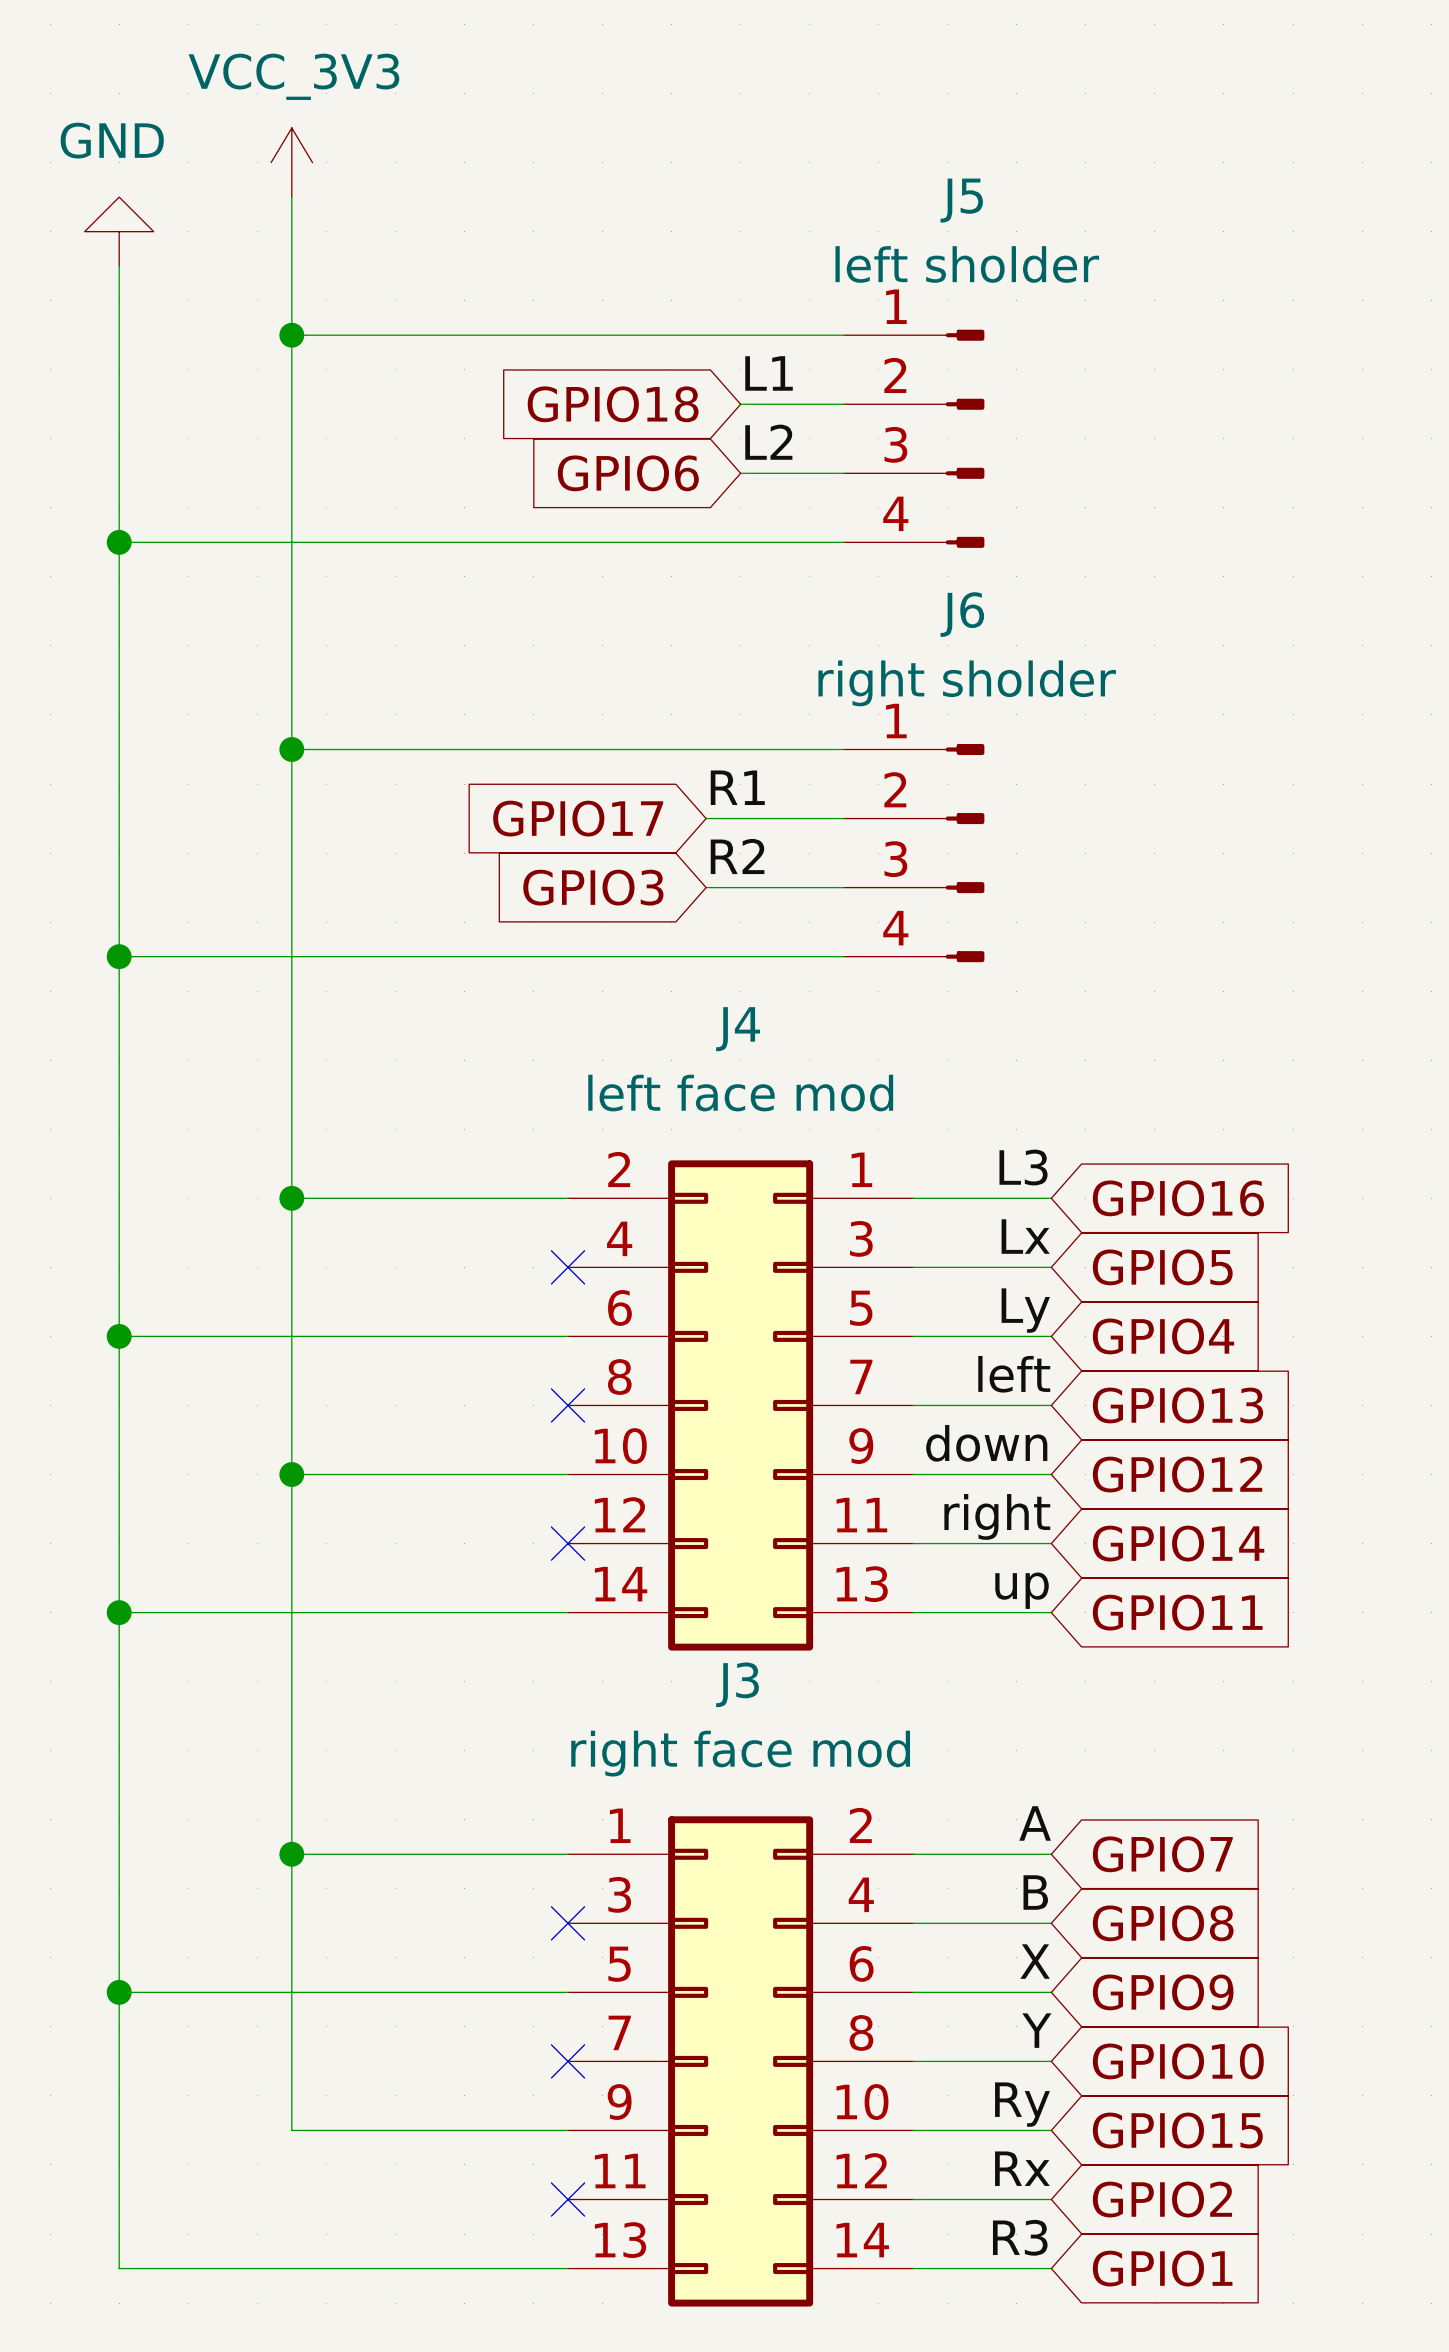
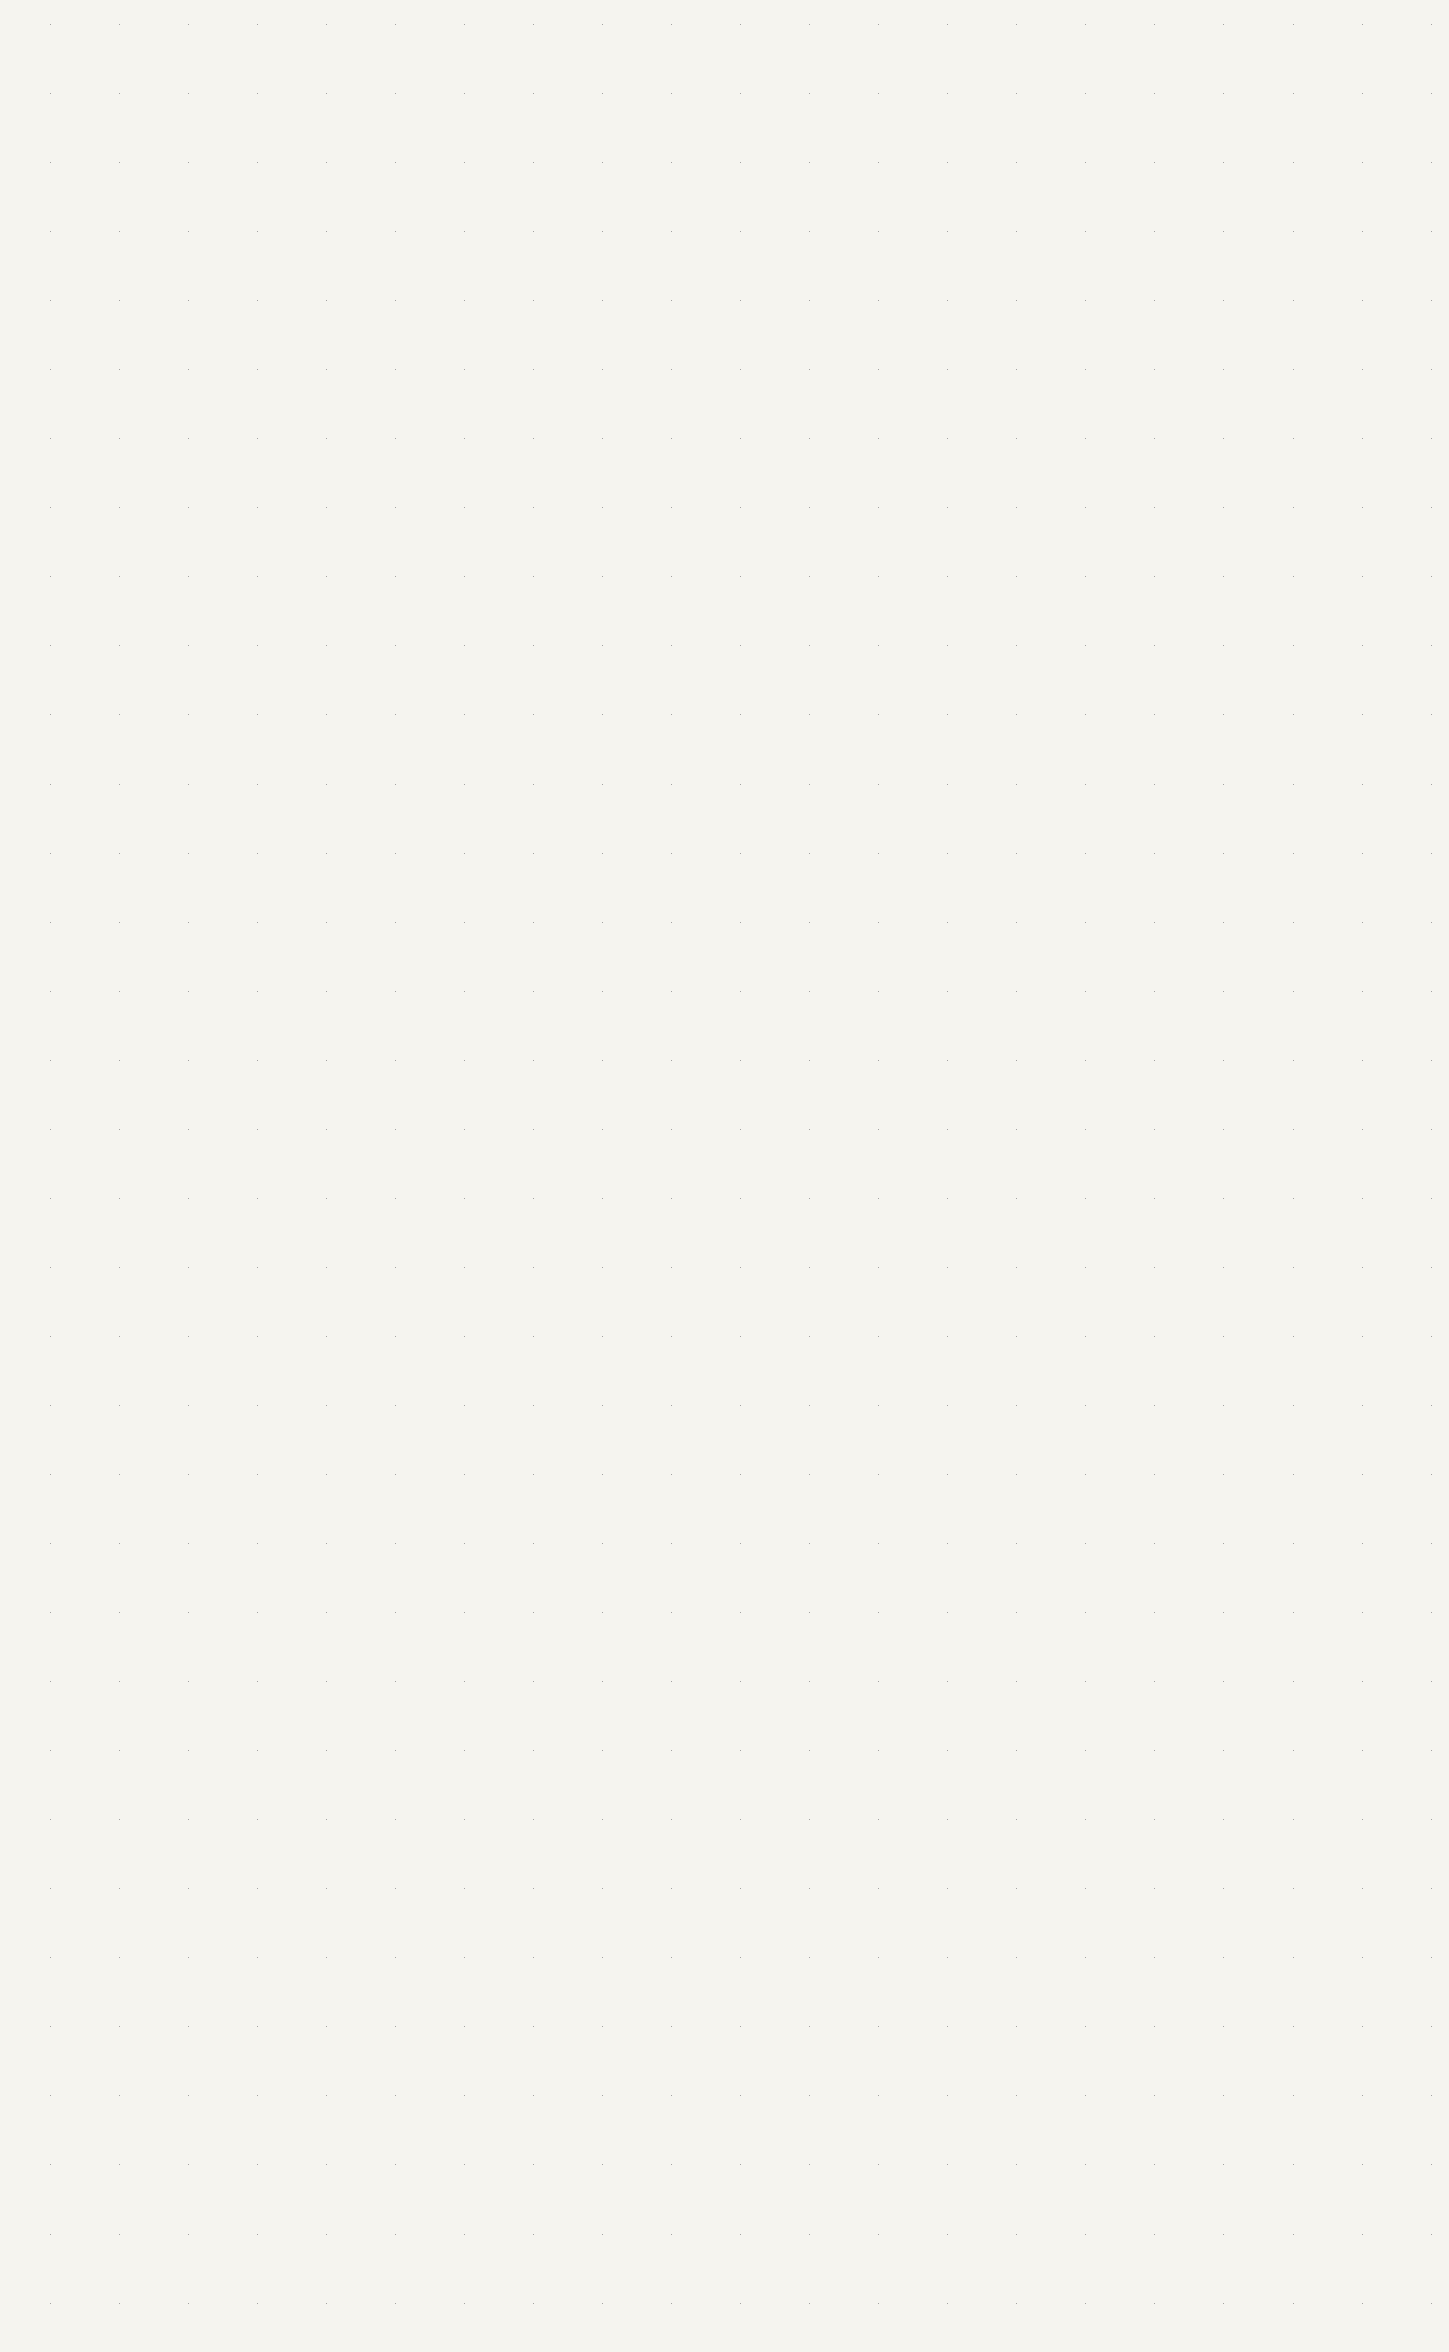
power symbol: VCC_3V3 (291, 162) -> none
wire: (291, 197) (291, 2130) (568, 2130) -> none
power symbol: GND (119, 231) -> none
wire: (119, 266) (119, 2268) (568, 2268) -> none
wire: (291, 335) (844, 335) -> none
junction: (291, 335) -> none
label: L1 (769, 373) -> none
global label: GPIO18 (613, 404) -> none
wire: (740, 404) (844, 404) -> none
J5: left sholder (914, 438) -> none
label: L2 (768, 442) -> none
global label: GPIO6 (628, 473) -> none
wire: (740, 473) (844, 473) -> none
wire: (119, 542) (844, 542) -> none
junction: (119, 542) -> none
wire: (291, 749) (844, 749) -> none
junction: (291, 749) -> none
label: R1 (737, 787) -> none
global label: GPIO17 (578, 818) -> none
wire: (706, 818) (844, 818) -> none
J6: right sholder (914, 853) -> none
label: R2 (737, 856) -> none
global label: GPIO3 (593, 887) -> none
wire: (706, 887) (844, 887) -> none
wire: (119, 956) (844, 956) -> none
junction: (119, 956) -> none
label: L3 (1023, 1167) -> none
wire: (291, 1198) (568, 1198) -> none
junction: (291, 1198) -> none
wire: (913, 1198) (1051, 1198) -> none
global label: GPIO16 (1178, 1198) -> none
label: Lx (1025, 1236) -> none
no-connect mark: (568, 1267) -> none
wire: (913, 1267) (1051, 1267) -> none
global label: GPIO5 (1162, 1267) -> none
label: Ly (1025, 1310) -> none
wire: (119, 1336) (568, 1336) -> none
junction: (119, 1336) -> none
wire: (913, 1336) (1051, 1336) -> none
global label: GPIO4 (1163, 1336) -> none
label: left (1014, 1374) -> none
no-connect mark: (568, 1405) -> none
J4: left face mod (740, 1405) -> none
wire: (913, 1405) (1051, 1405) -> none
global label: GPIO13 (1177, 1405) -> none
label: down (986, 1443) -> none
wire: (291, 1474) (568, 1474) -> none
junction: (291, 1474) -> none
wire: (913, 1474) (1051, 1474) -> none
global label: GPIO12 (1177, 1474) -> none
label: right (997, 1516) -> none
no-connect mark: (568, 1543) -> none
wire: (913, 1543) (1051, 1543) -> none
global label: GPIO14 (1178, 1543) -> none
label: up (1022, 1590) -> none
wire: (119, 1612) (568, 1612) -> none
junction: (119, 1612) -> none
wire: (913, 1612) (1051, 1612) -> none
global label: GPIO11 (1177, 1612) -> none
label: A (1035, 1823) -> none
wire: (291, 1854) (568, 1854) -> none
junction: (291, 1854) -> none
wire: (913, 1854) (1051, 1854) -> none
global label: GPIO7 (1162, 1854) -> none
label: B (1035, 1892) -> none
no-connect mark: (568, 1923) -> none
wire: (913, 1923) (1051, 1923) -> none
global label: GPIO8 (1163, 1923) -> none
label: X (1035, 1961) -> none
wire: (119, 1992) (568, 1992) -> none
junction: (119, 1992) -> none
wire: (913, 1992) (1051, 1992) -> none
global label: GPIO9 (1163, 1992) -> none
label: Y (1036, 2030) -> none
no-connect mark: (568, 2061) -> none
J3: right face mod (740, 2061) -> none
wire: (913, 2061) (1051, 2061) -> none
global label: GPIO10 (1178, 2061) -> none
label: Ry (1022, 2104) -> none
wire: (913, 2130) (1051, 2130) -> none
global label: GPIO15 (1177, 2130) -> none
label: Rx (1022, 2168) -> none
no-connect mark: (568, 2199) -> none
wire: (913, 2199) (1051, 2199) -> none
global label: GPIO2 (1162, 2199) -> none
label: R3 (1020, 2237) -> none
wire: (913, 2268) (1051, 2268) -> none
global label: GPIO1 (1162, 2268) -> none

